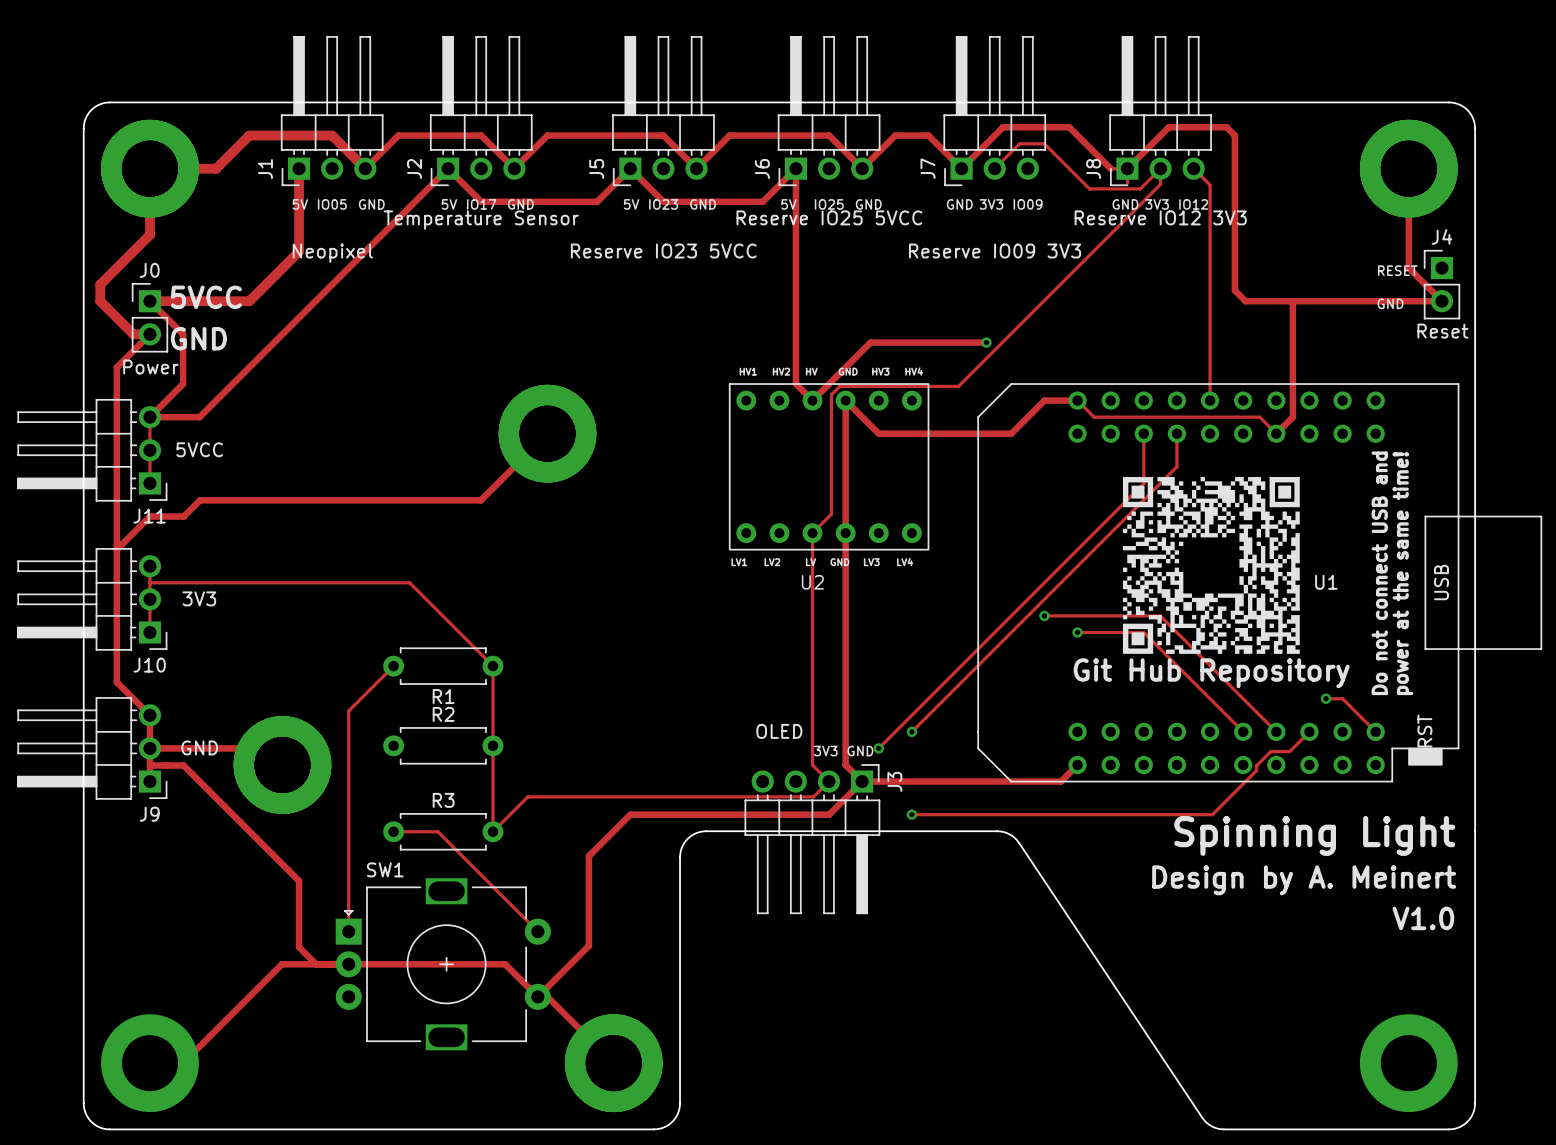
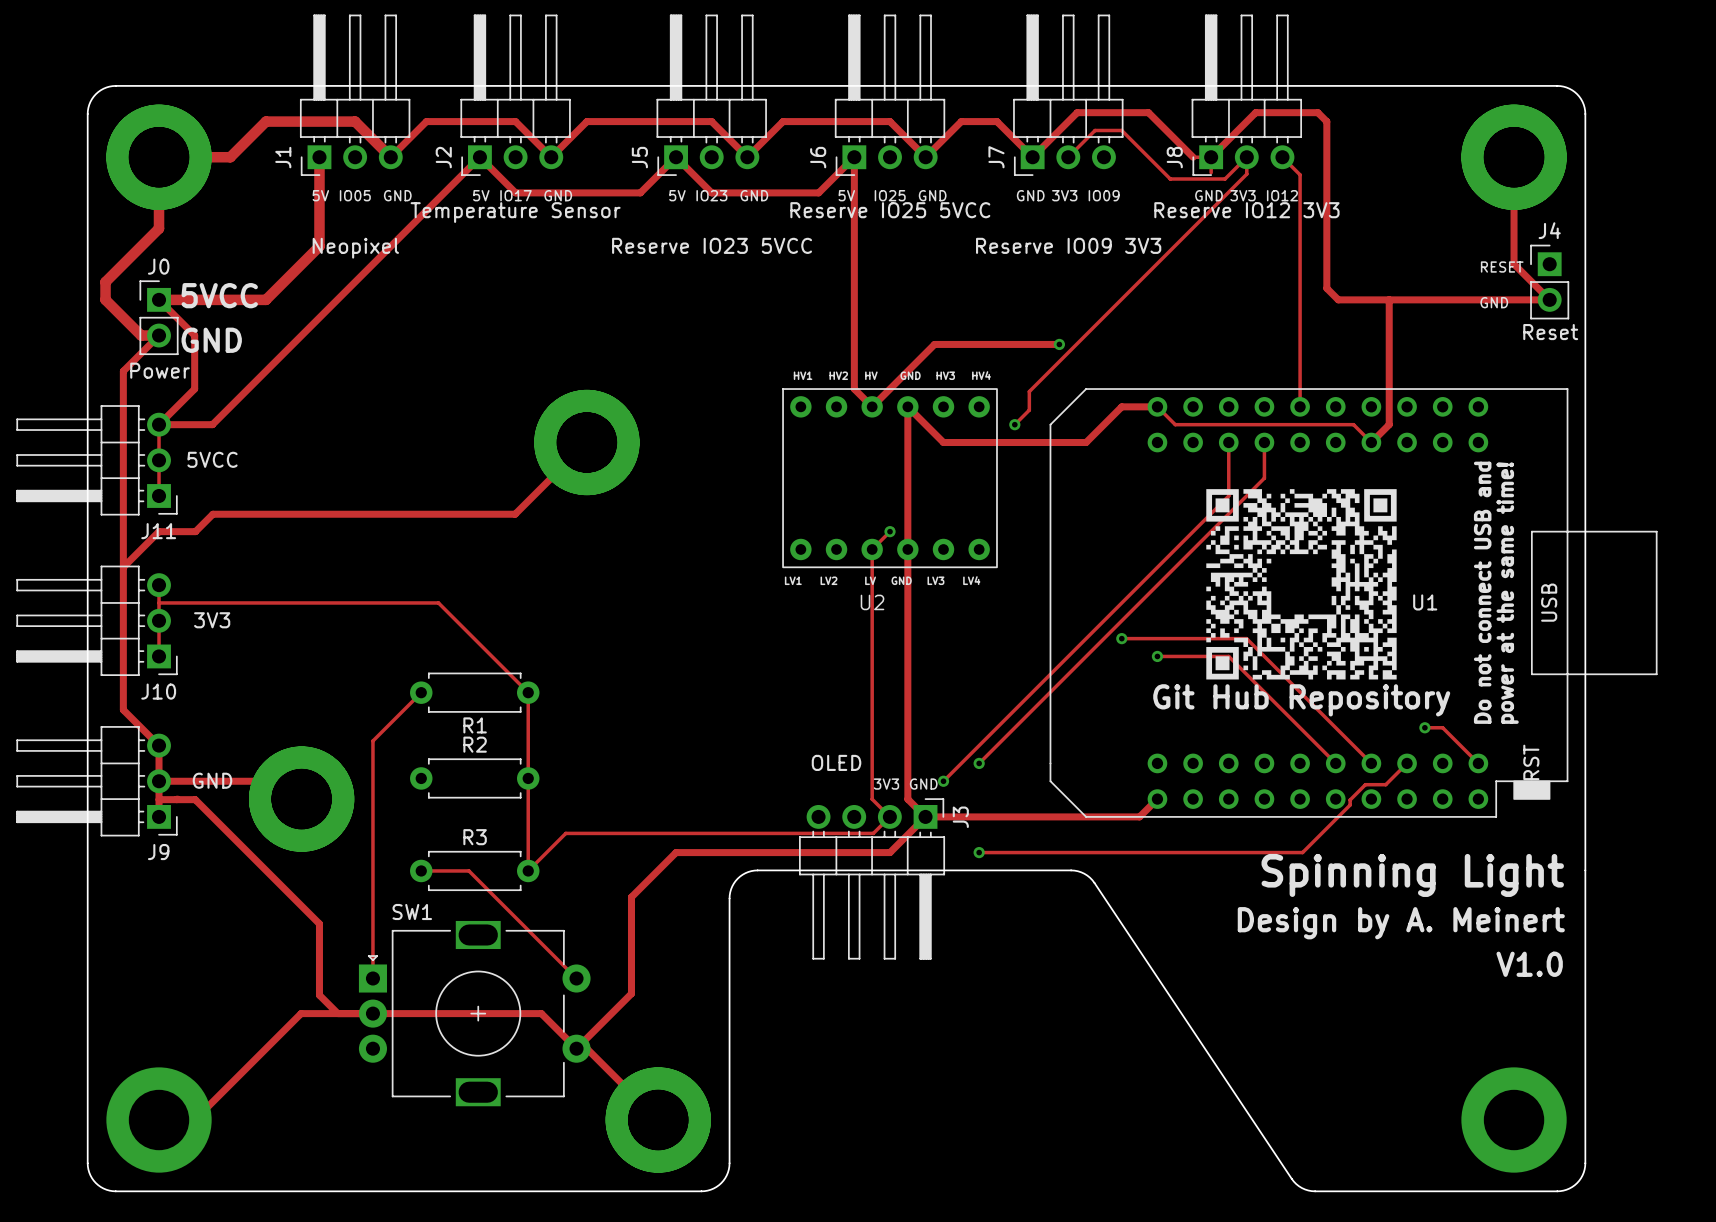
track: (958, 386) (839, 386) (831, 394) (831, 514) -> (1029, 391) (1029, 410) (1014, 424)
via: none -> (1014, 424)
via: none -> (890, 531)

